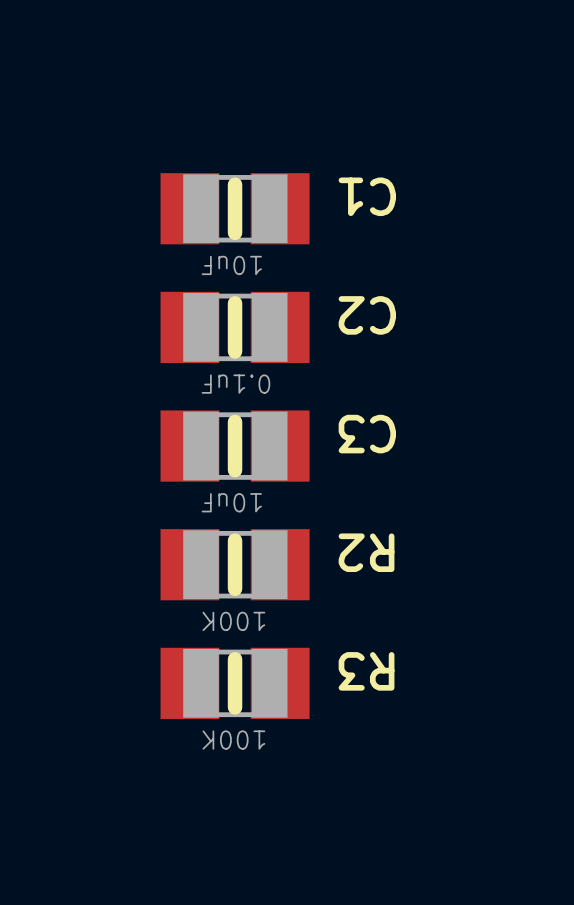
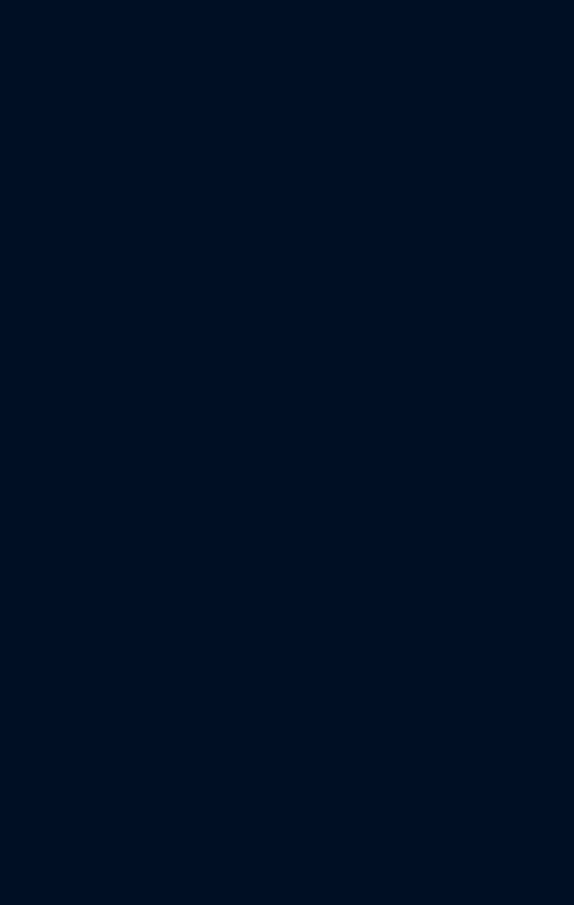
C1: 10uF (235, 208) -> none
C2: 0.1uF (235, 327) -> none
C3: 10uF (235, 446) -> none
R2: 100K (235, 564) -> none
R3: 100K (235, 683) -> none

